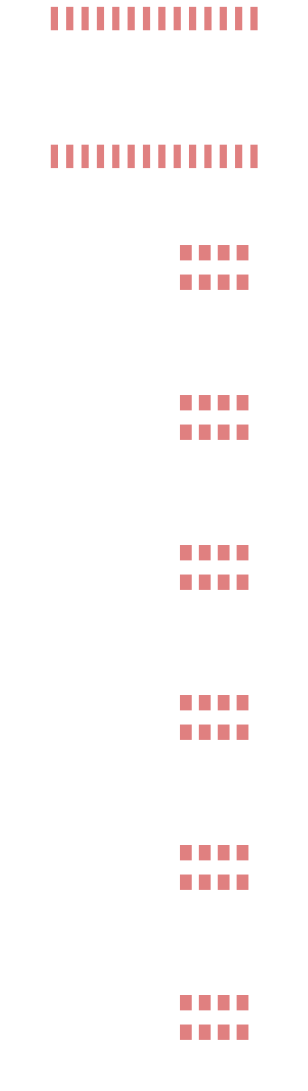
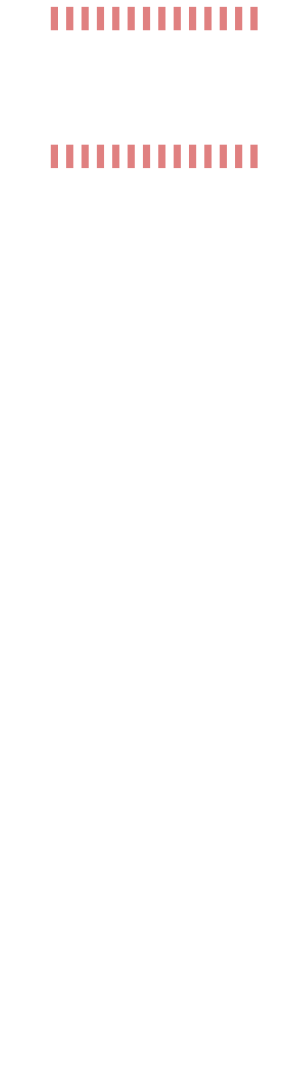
part: (214, 267) -> none
part: (214, 417) -> none
part: (214, 567) -> none
part: (214, 717) -> none
part: (214, 867) -> none
part: (214, 1017) -> none

